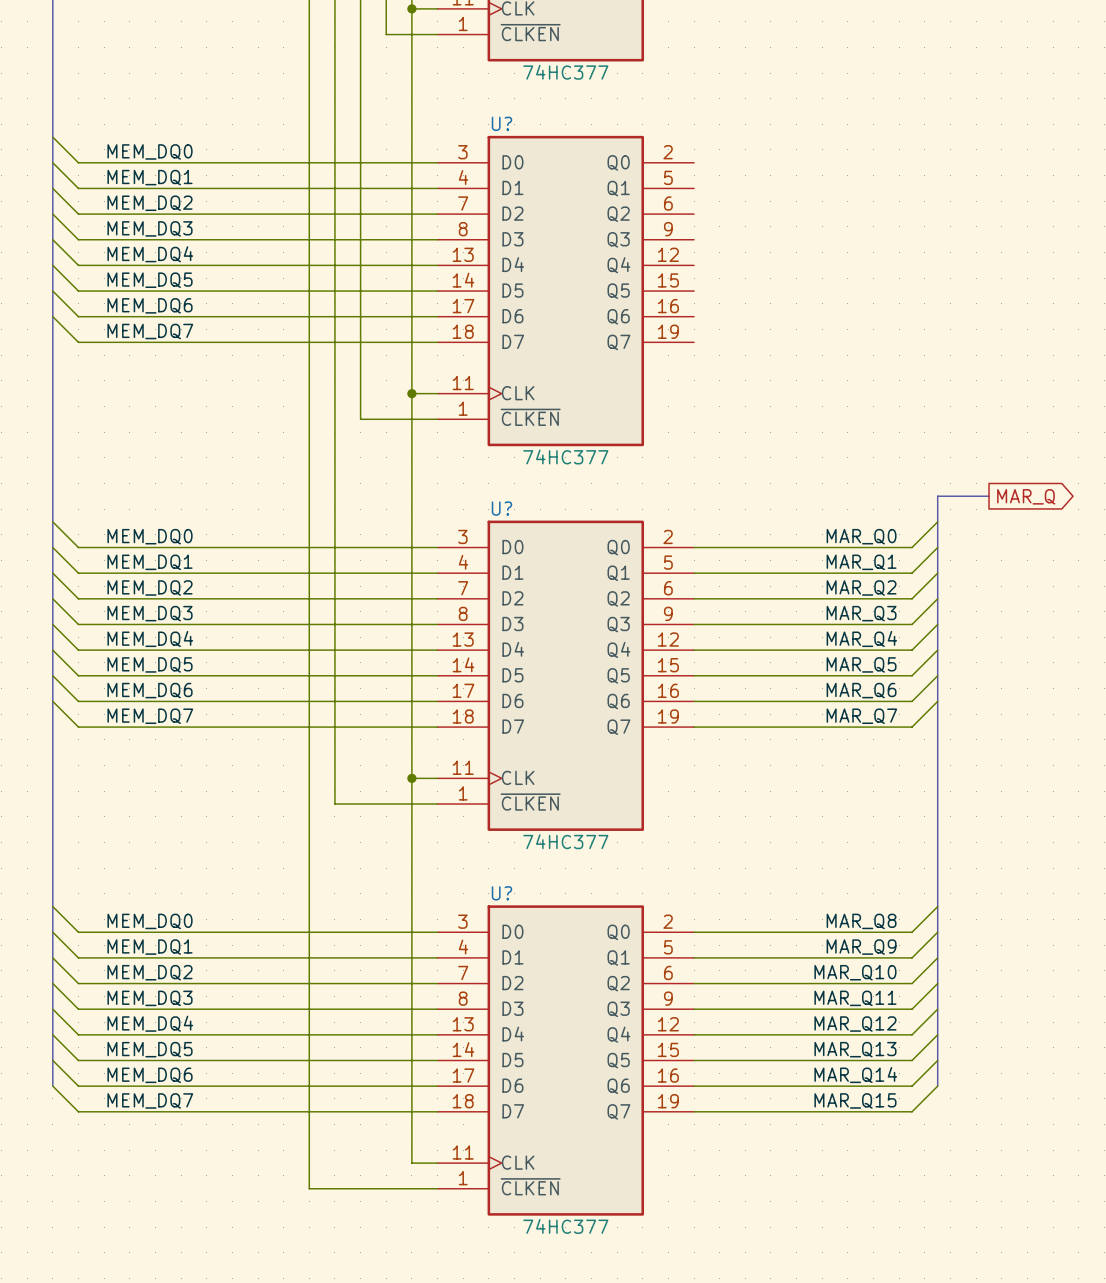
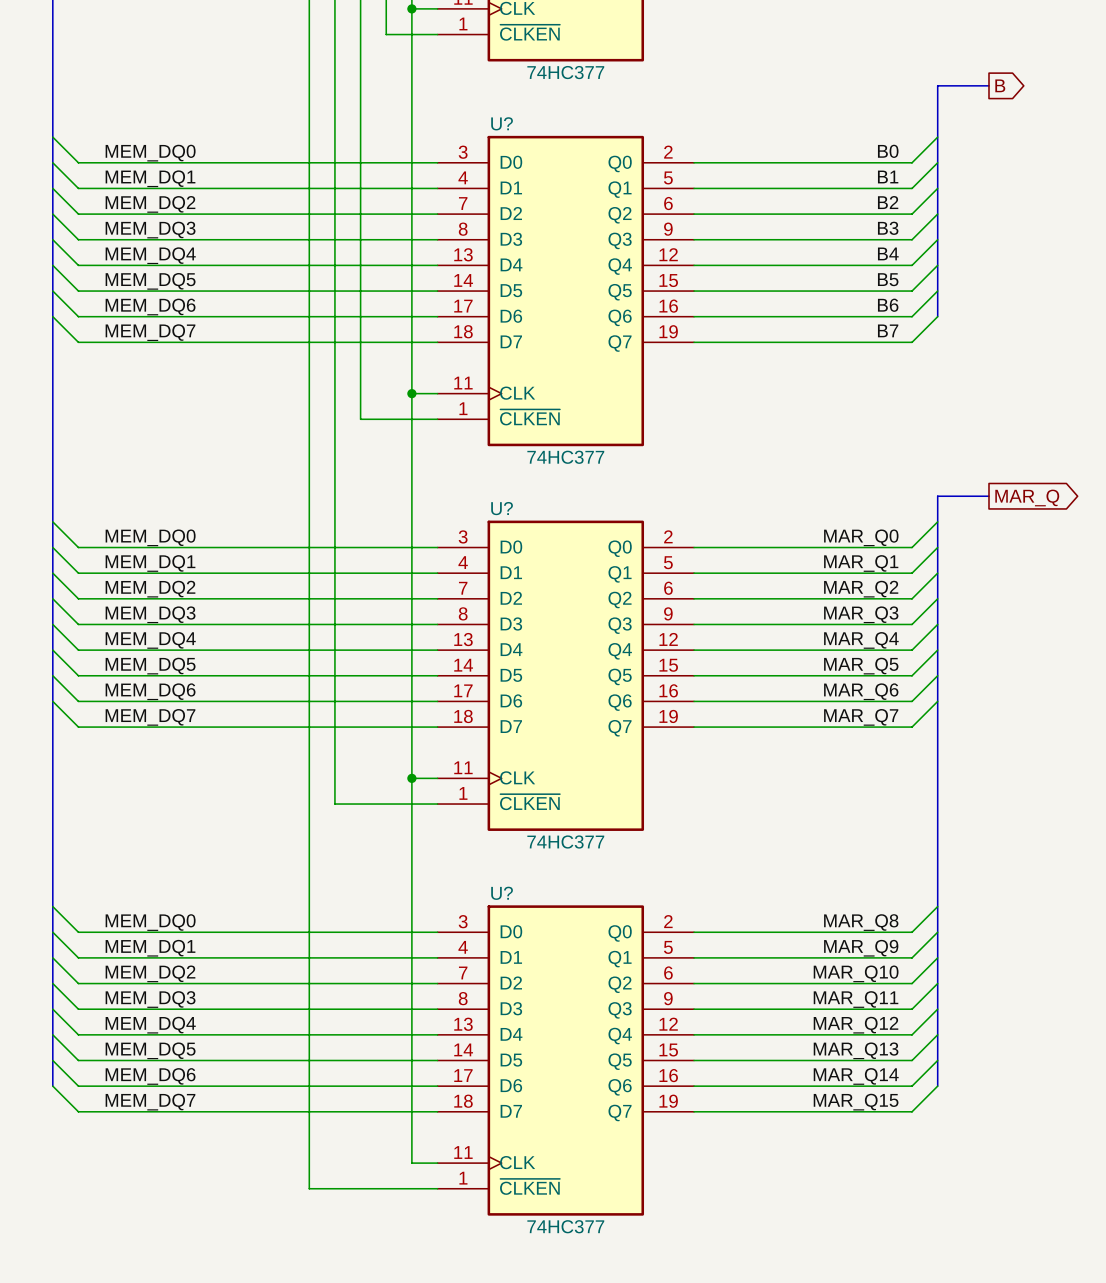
bus: none -> (988, 85) (937, 85) (937, 316)
global label: none -> B (1000, 85)
wire: none -> (937, 137) (912, 162) (694, 162)
label: none -> B0 (888, 151)
wire: none -> (937, 162) (912, 188) (694, 188)
label: none -> B1 (888, 177)
wire: none -> (937, 188) (912, 214) (694, 214)
label: none -> B2 (888, 202)
wire: none -> (937, 214) (912, 239) (694, 239)
label: none -> B3 (888, 228)
wire: none -> (937, 239) (912, 265) (694, 265)
label: none -> B4 (888, 253)
wire: none -> (937, 265) (912, 291) (694, 291)
label: none -> B5 (888, 279)
wire: none -> (937, 291) (912, 316) (694, 316)
label: none -> B6 (888, 305)
wire: none -> (937, 316) (912, 342) (694, 342)
label: none -> B7 (888, 330)

